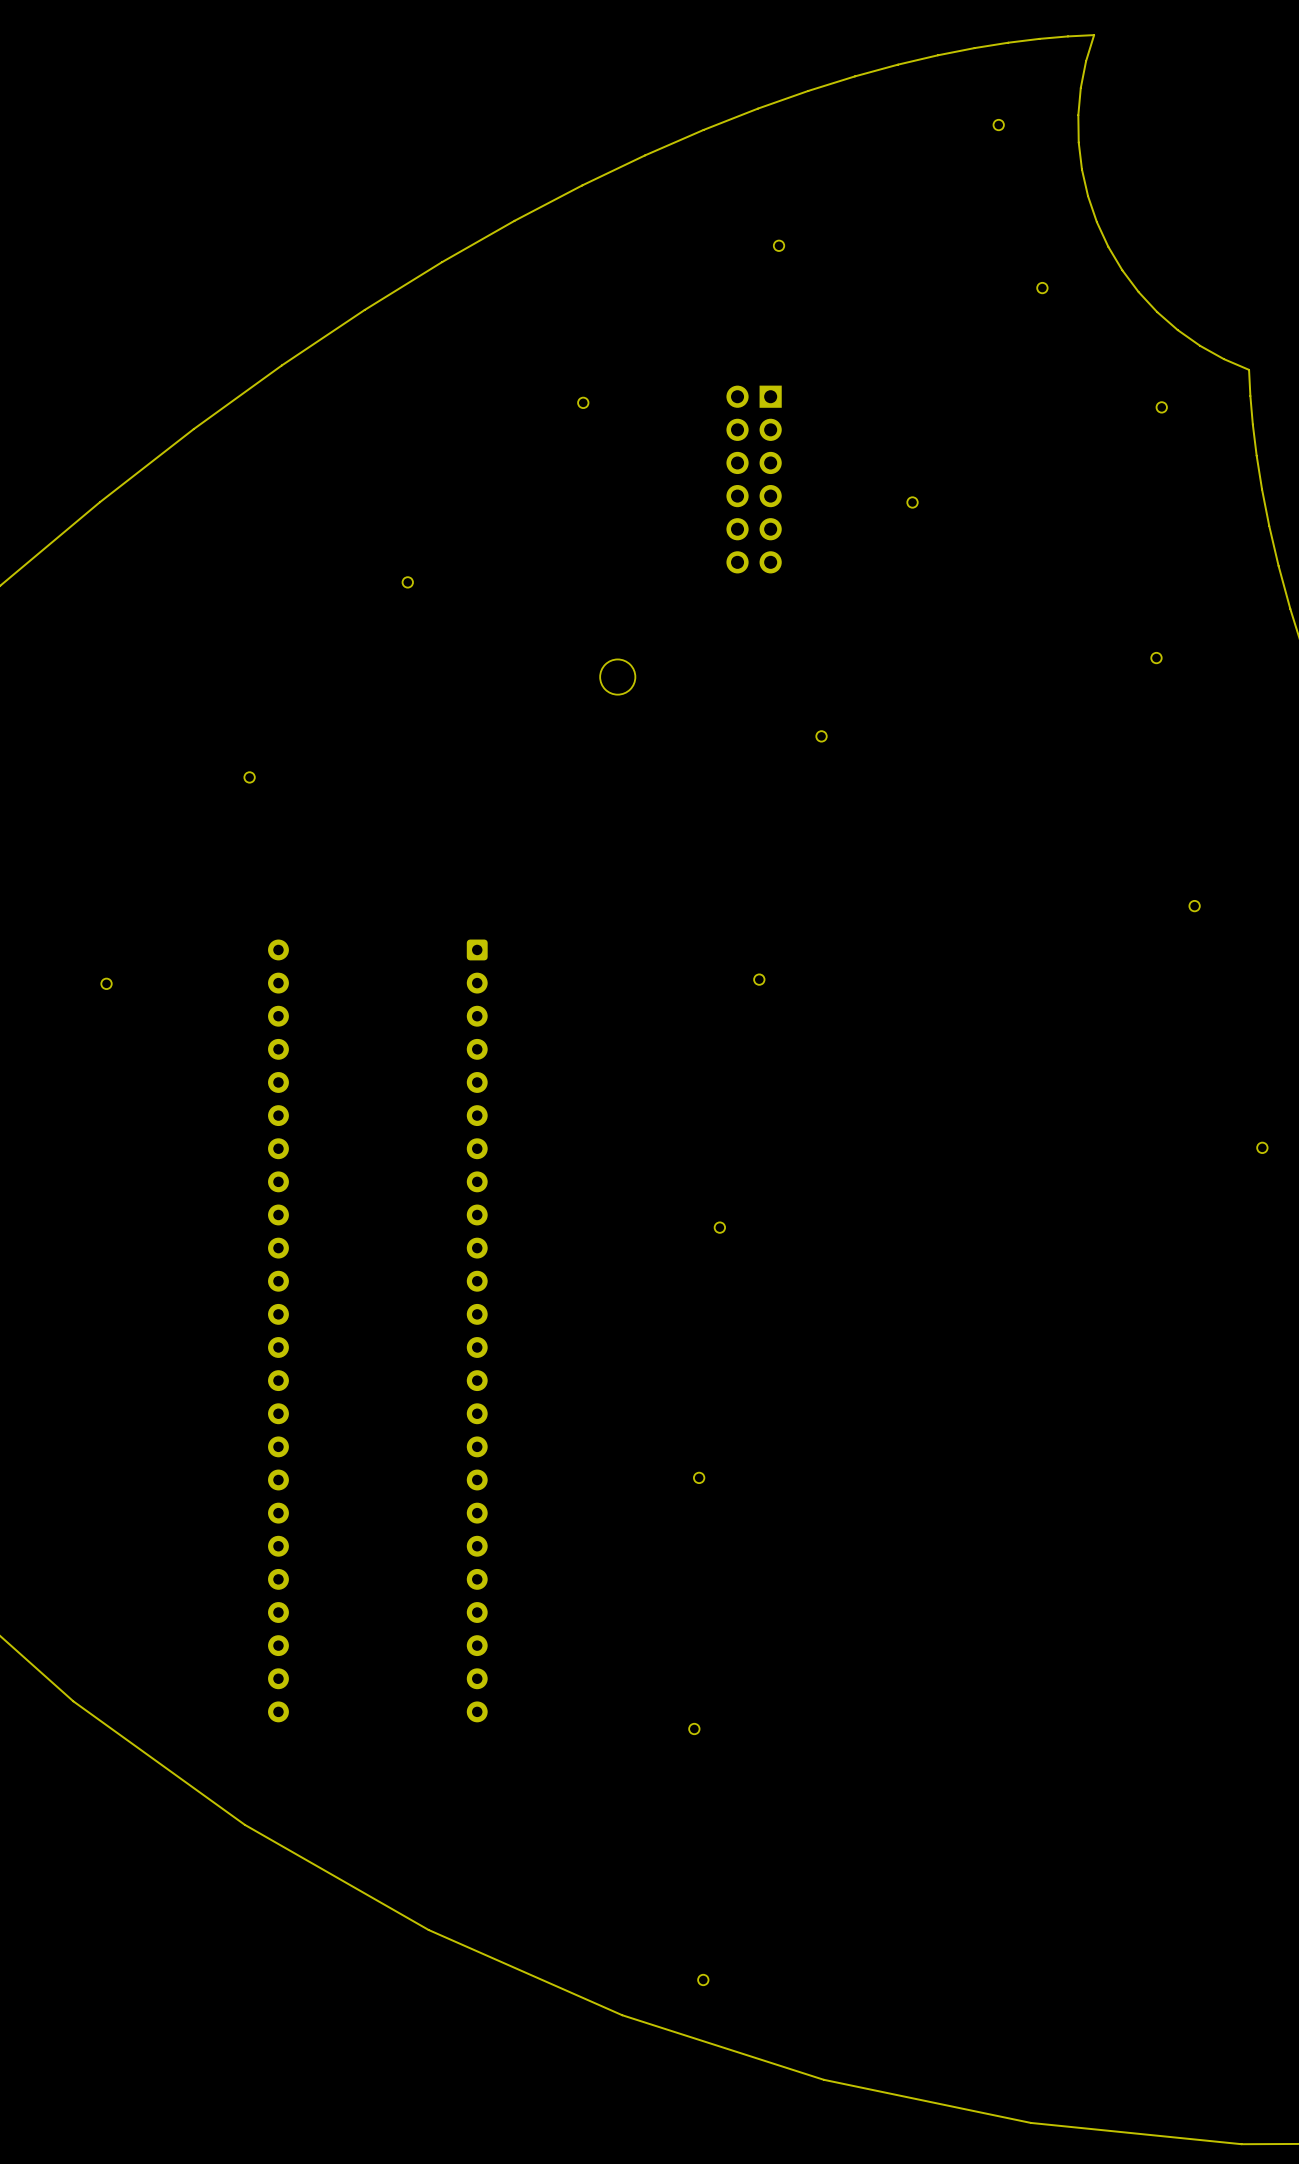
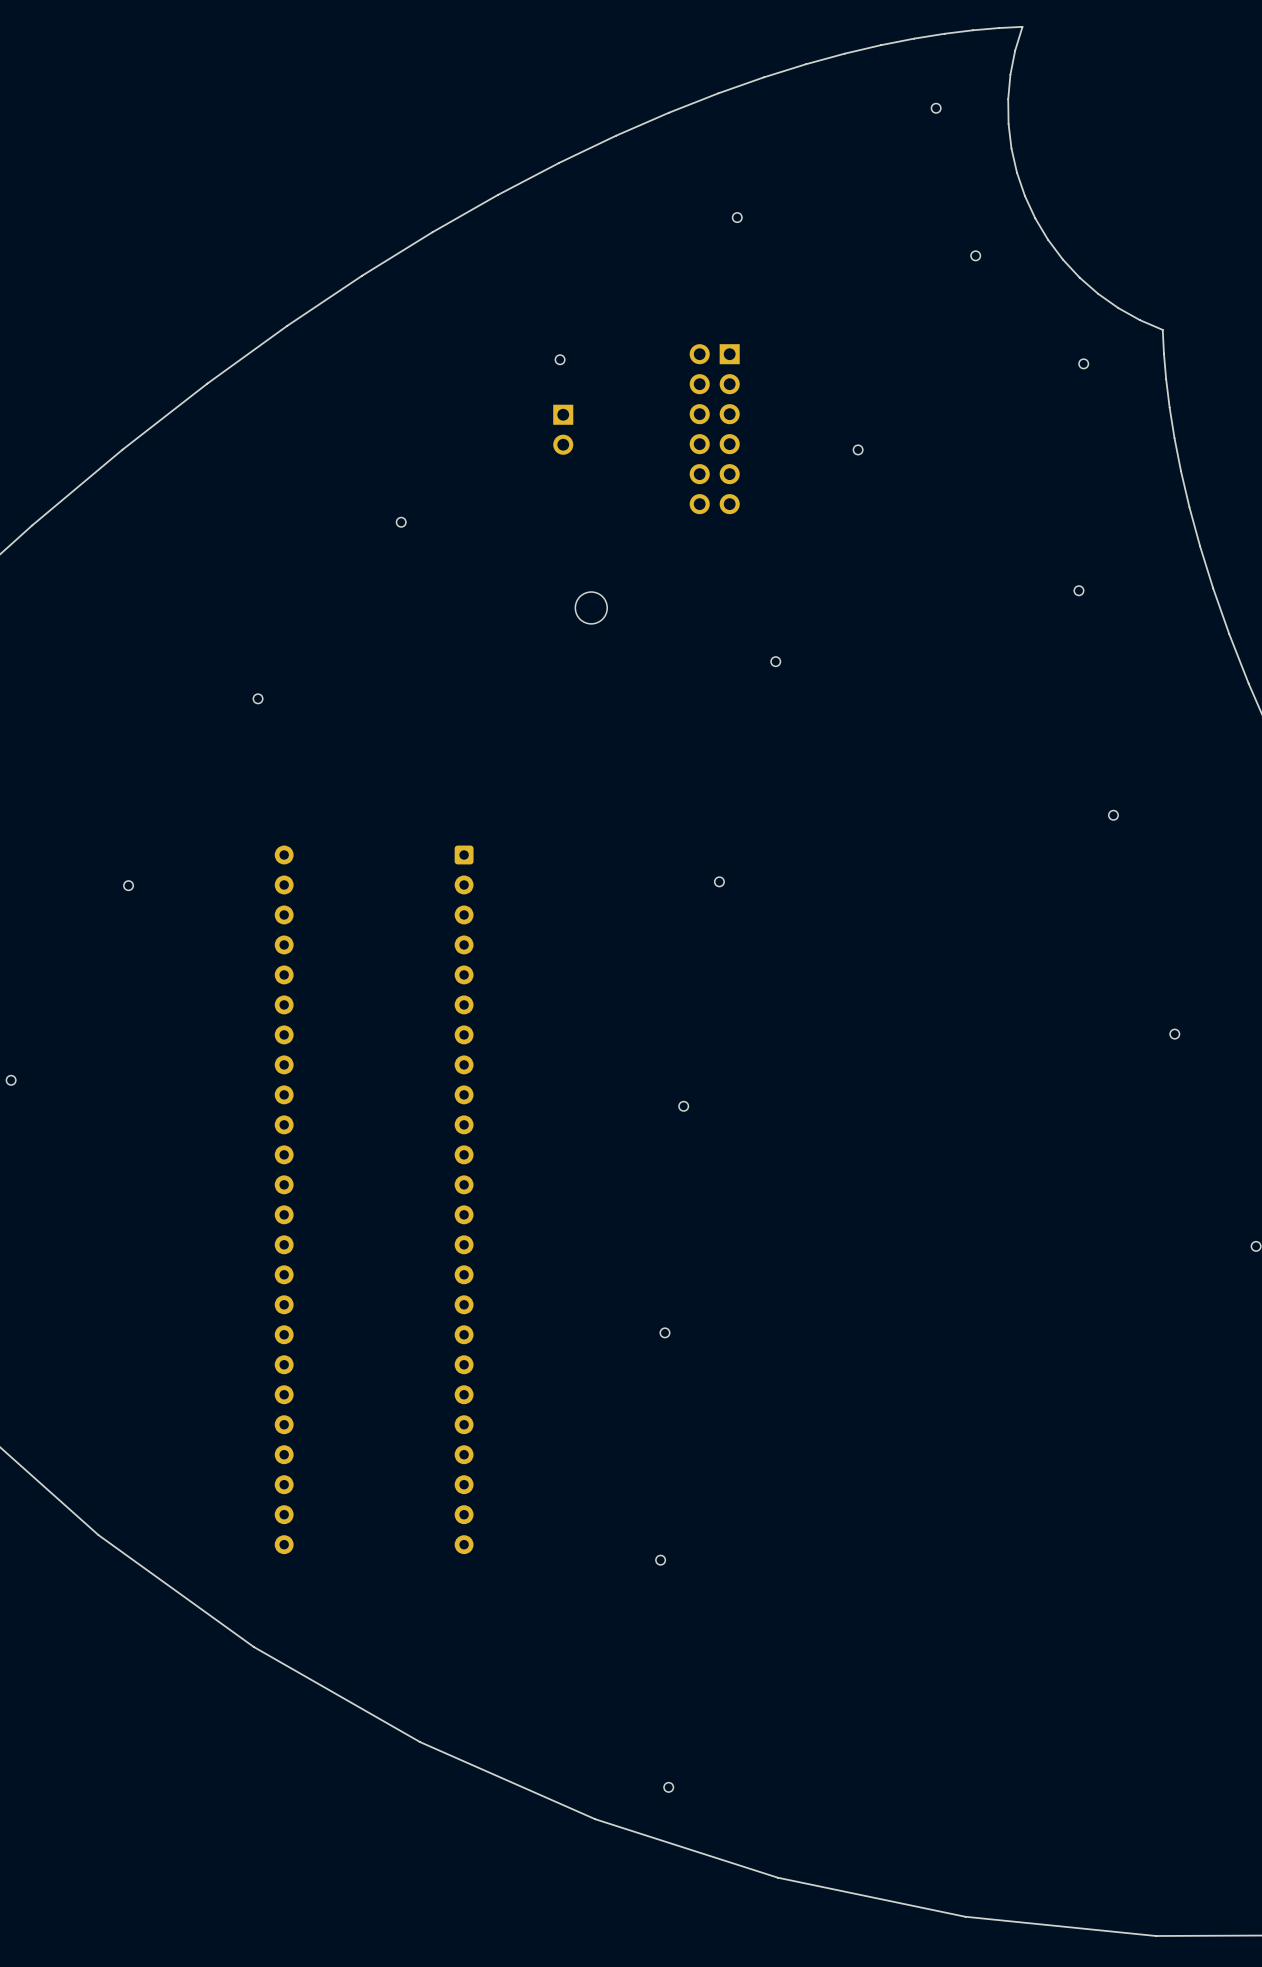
part: none -> (563, 429)

